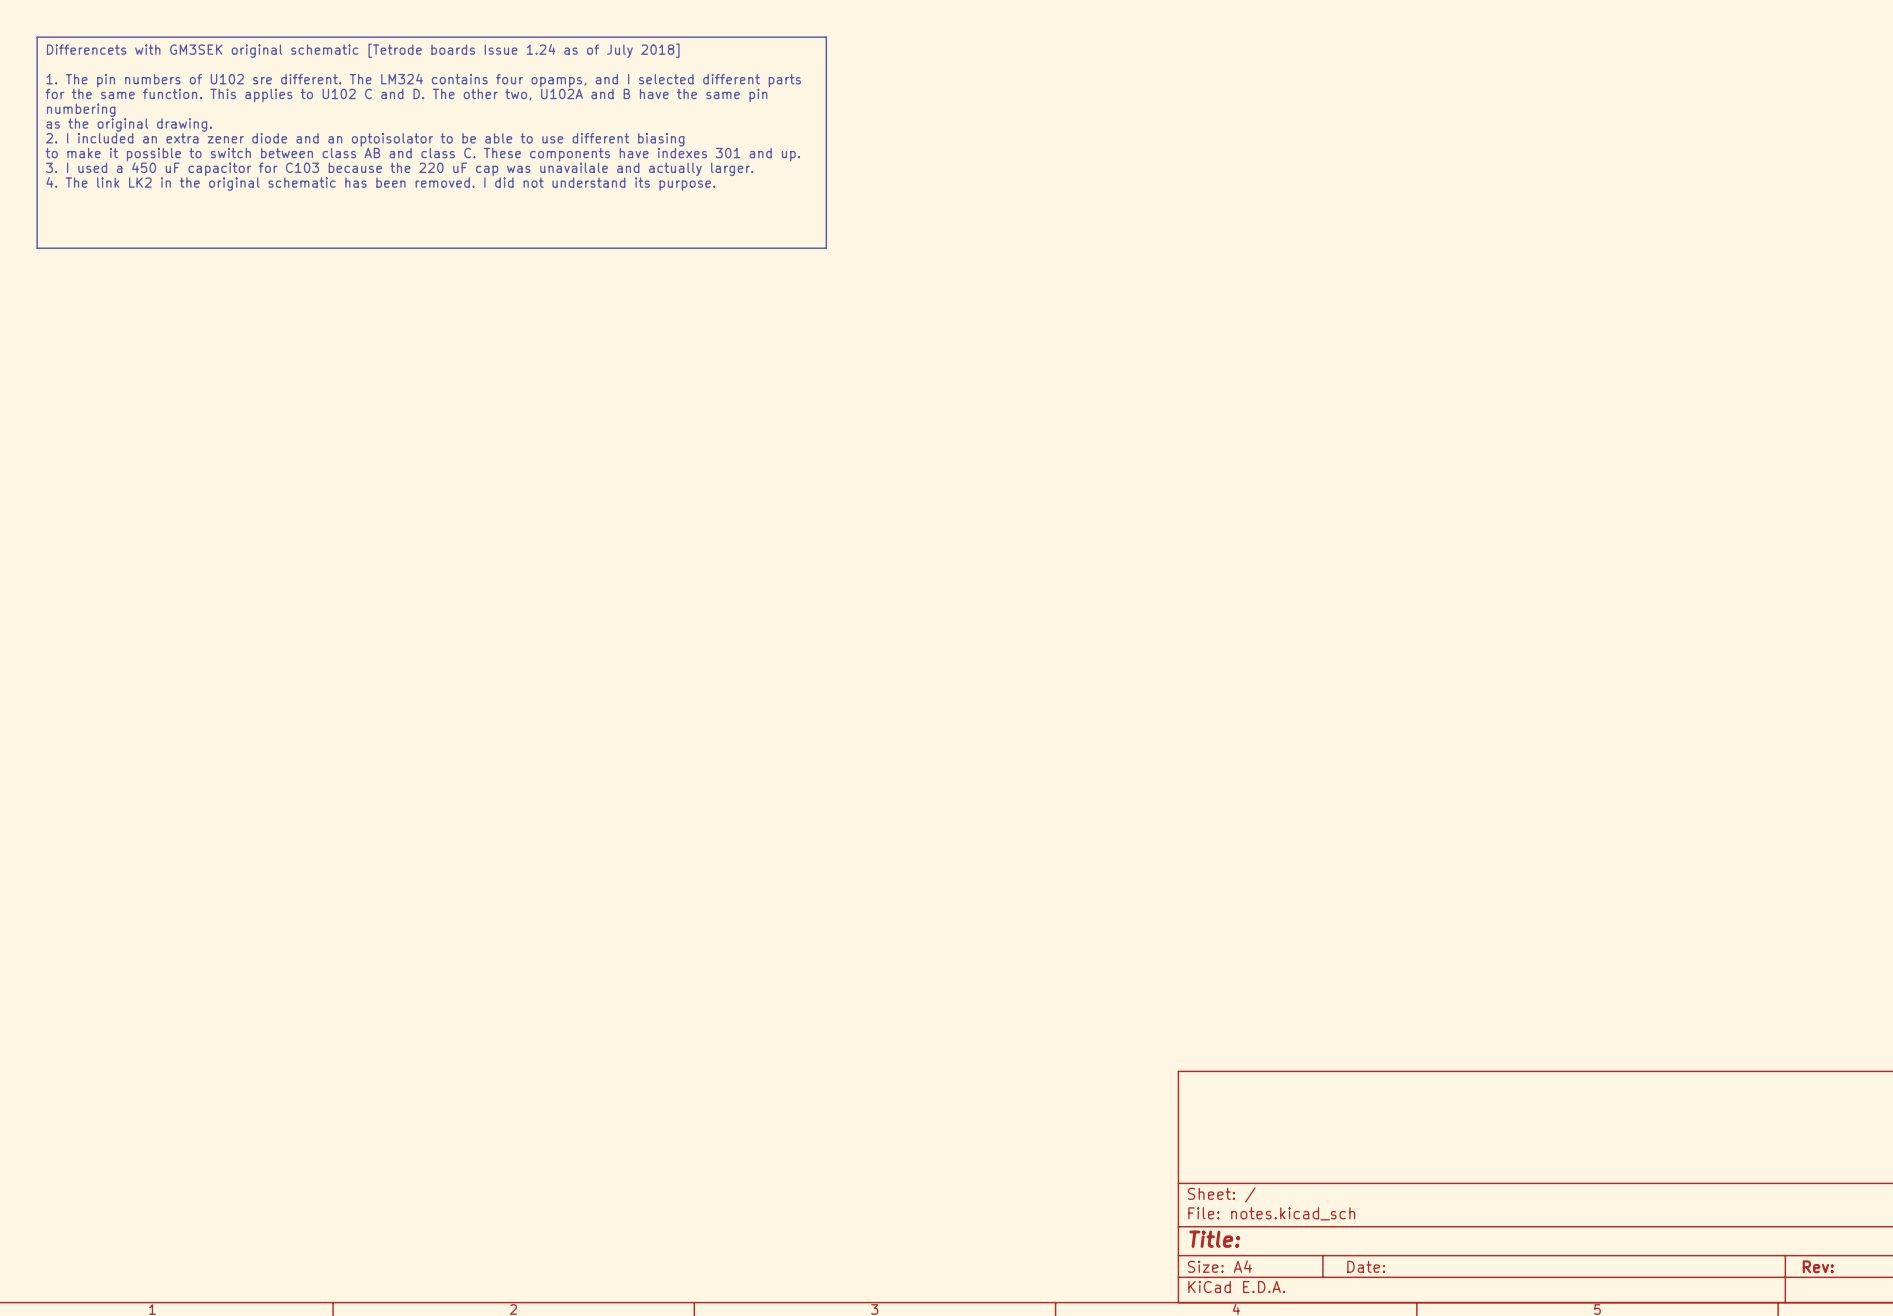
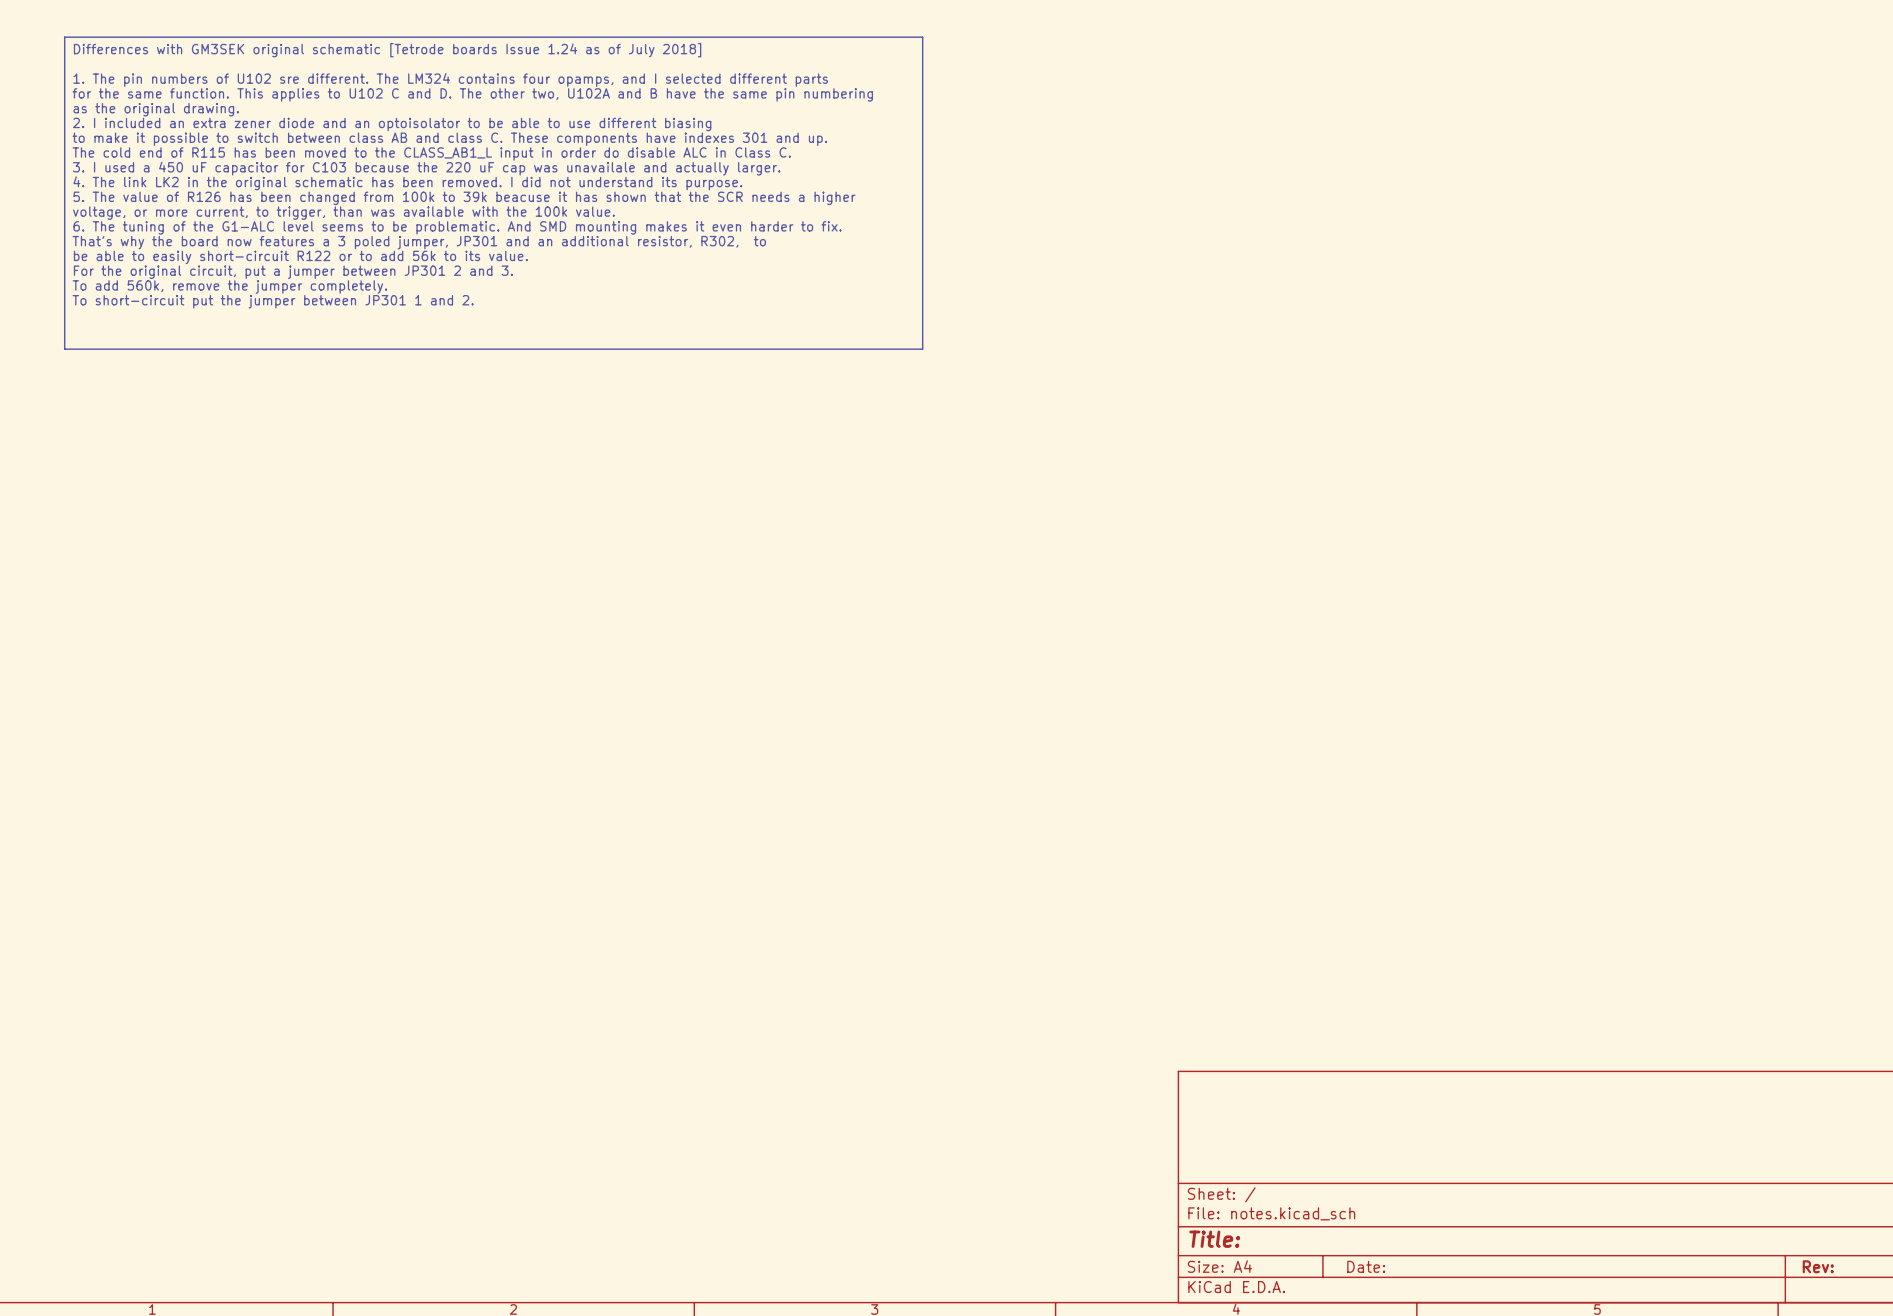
line: (64, 37) (37, 37) (37, 248) (826, 248) (826, 37) -> (64, 37) (64, 349) (922, 349) (922, 37) (826, 37)
text: Differencets with GM3SEK original schematic [Tetrode boards Issue 1.24 as of July 2018] (363, 50) -> Differences with GM3SEK original schematic [Tetrode boards Issue 1.24 as of July 2018] (387, 50)
text position: 1. The pin numbers of U102 sre different. The LM324 contains four opamps, and I selected different parts (423, 80) -> 1. The pin numbers of U102 sre different. The LM324 contains four opamps, and I selected different parts (450, 79)
text: for the same function. This applies to U102 C and D. The other two, U102A and B have the same pin (406, 95) -> for the same function. This applies to U102 C and D. The other two, U102A and B have the same pin numbering (472, 94)
text: numbering (81, 110) -> none
text position: as the original drawing. (129, 125) -> as the original drawing. (156, 109)
text position: 2. I included an extra zener diode and an optoisolator to be able to use different biasing (365, 139) -> 2. I included an extra zener diode and an optoisolator to be able to use different biasing (392, 124)
text position: to make it possible to switch between class AB and class C. These components have indexes 301 and up. (422, 154) -> to make it possible to switch between class AB and class C. These components have indexes 301 and up. (449, 139)
text: none -> The cold end of R115 has been moved to the CLASS_AB1_L input in order do disable ALC in Class C. (431, 154)
text position: 3. I used a 450 uF capacitor for C103 because the 220 uF cap was unavailale and actually larger. (399, 169) -> 3. I used a 450 uF capacitor for C103 because the 220 uF cap was unavailale and actually larger. (426, 168)
text position: 4. The link LK2 in the original schematic has been removed. I did not understand its purpose. (380, 183) -> 4. The link LK2 in the original schematic has been removed. I did not understand its purpose. (407, 183)
text: none -> 5. The value of R126 has been changed from 100k to 39k beacuse it has shown that the SCR needs a higher (464, 198)
text: none -> voltage, or more current, to trigger, than was available with the 100k value. (343, 213)
text: none -> 6. The tuning of the G1-ALC level seems to be problematic. And SMD mounting makes it even harder to fix. (457, 227)
text: none -> That's why the board now features a 3 poled jumper, JP301 and an additional resistor, R302, to (419, 242)
text: none -> be able to easily short-circuit R122 or to add 56k to its value. (300, 257)
text: none -> For the original circuit, put a jumper between JP301 2 and 3. (293, 272)
text: none -> To add 560k, remove the jumper completely. (229, 286)
text: none -> To short-circuit put the jumper between JP301 1 and 2. (273, 301)

